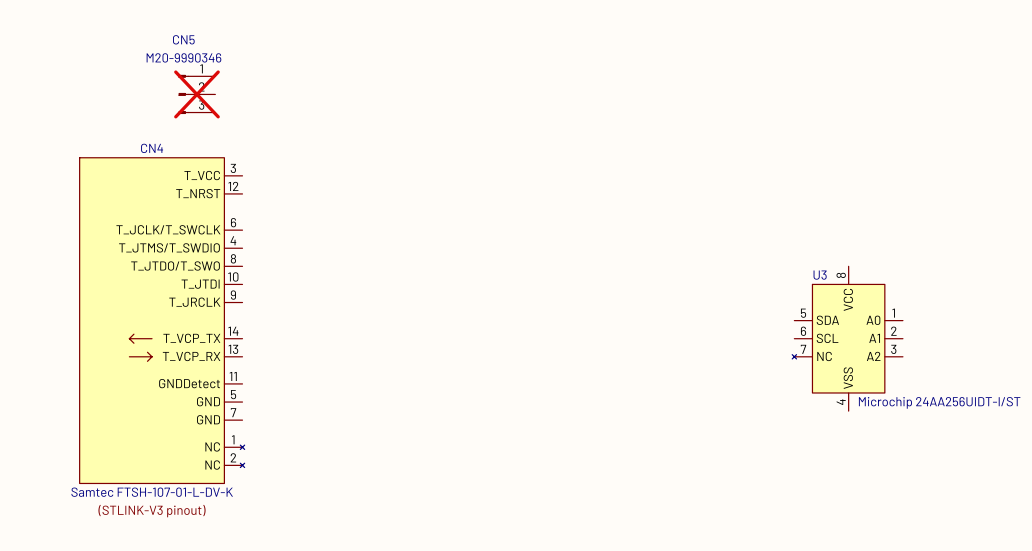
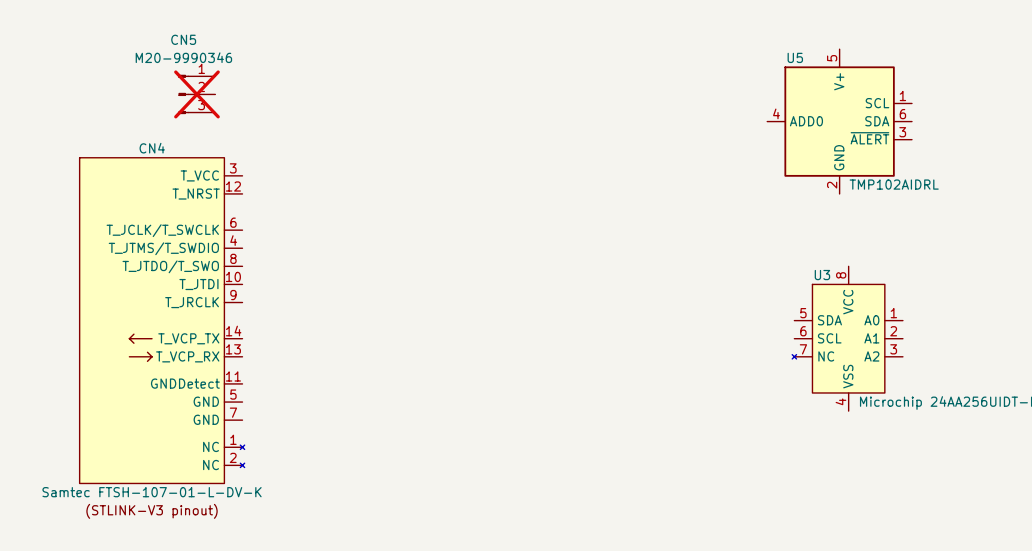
U5: none -> TMP102AIDRL (839, 121)

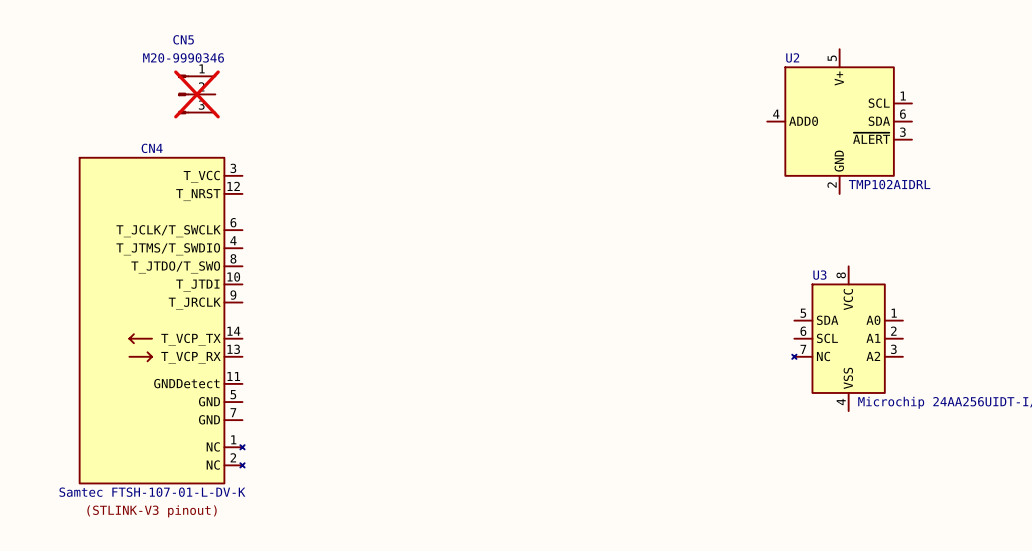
U5 name: U5 (795, 57) -> U2 (792, 57)

